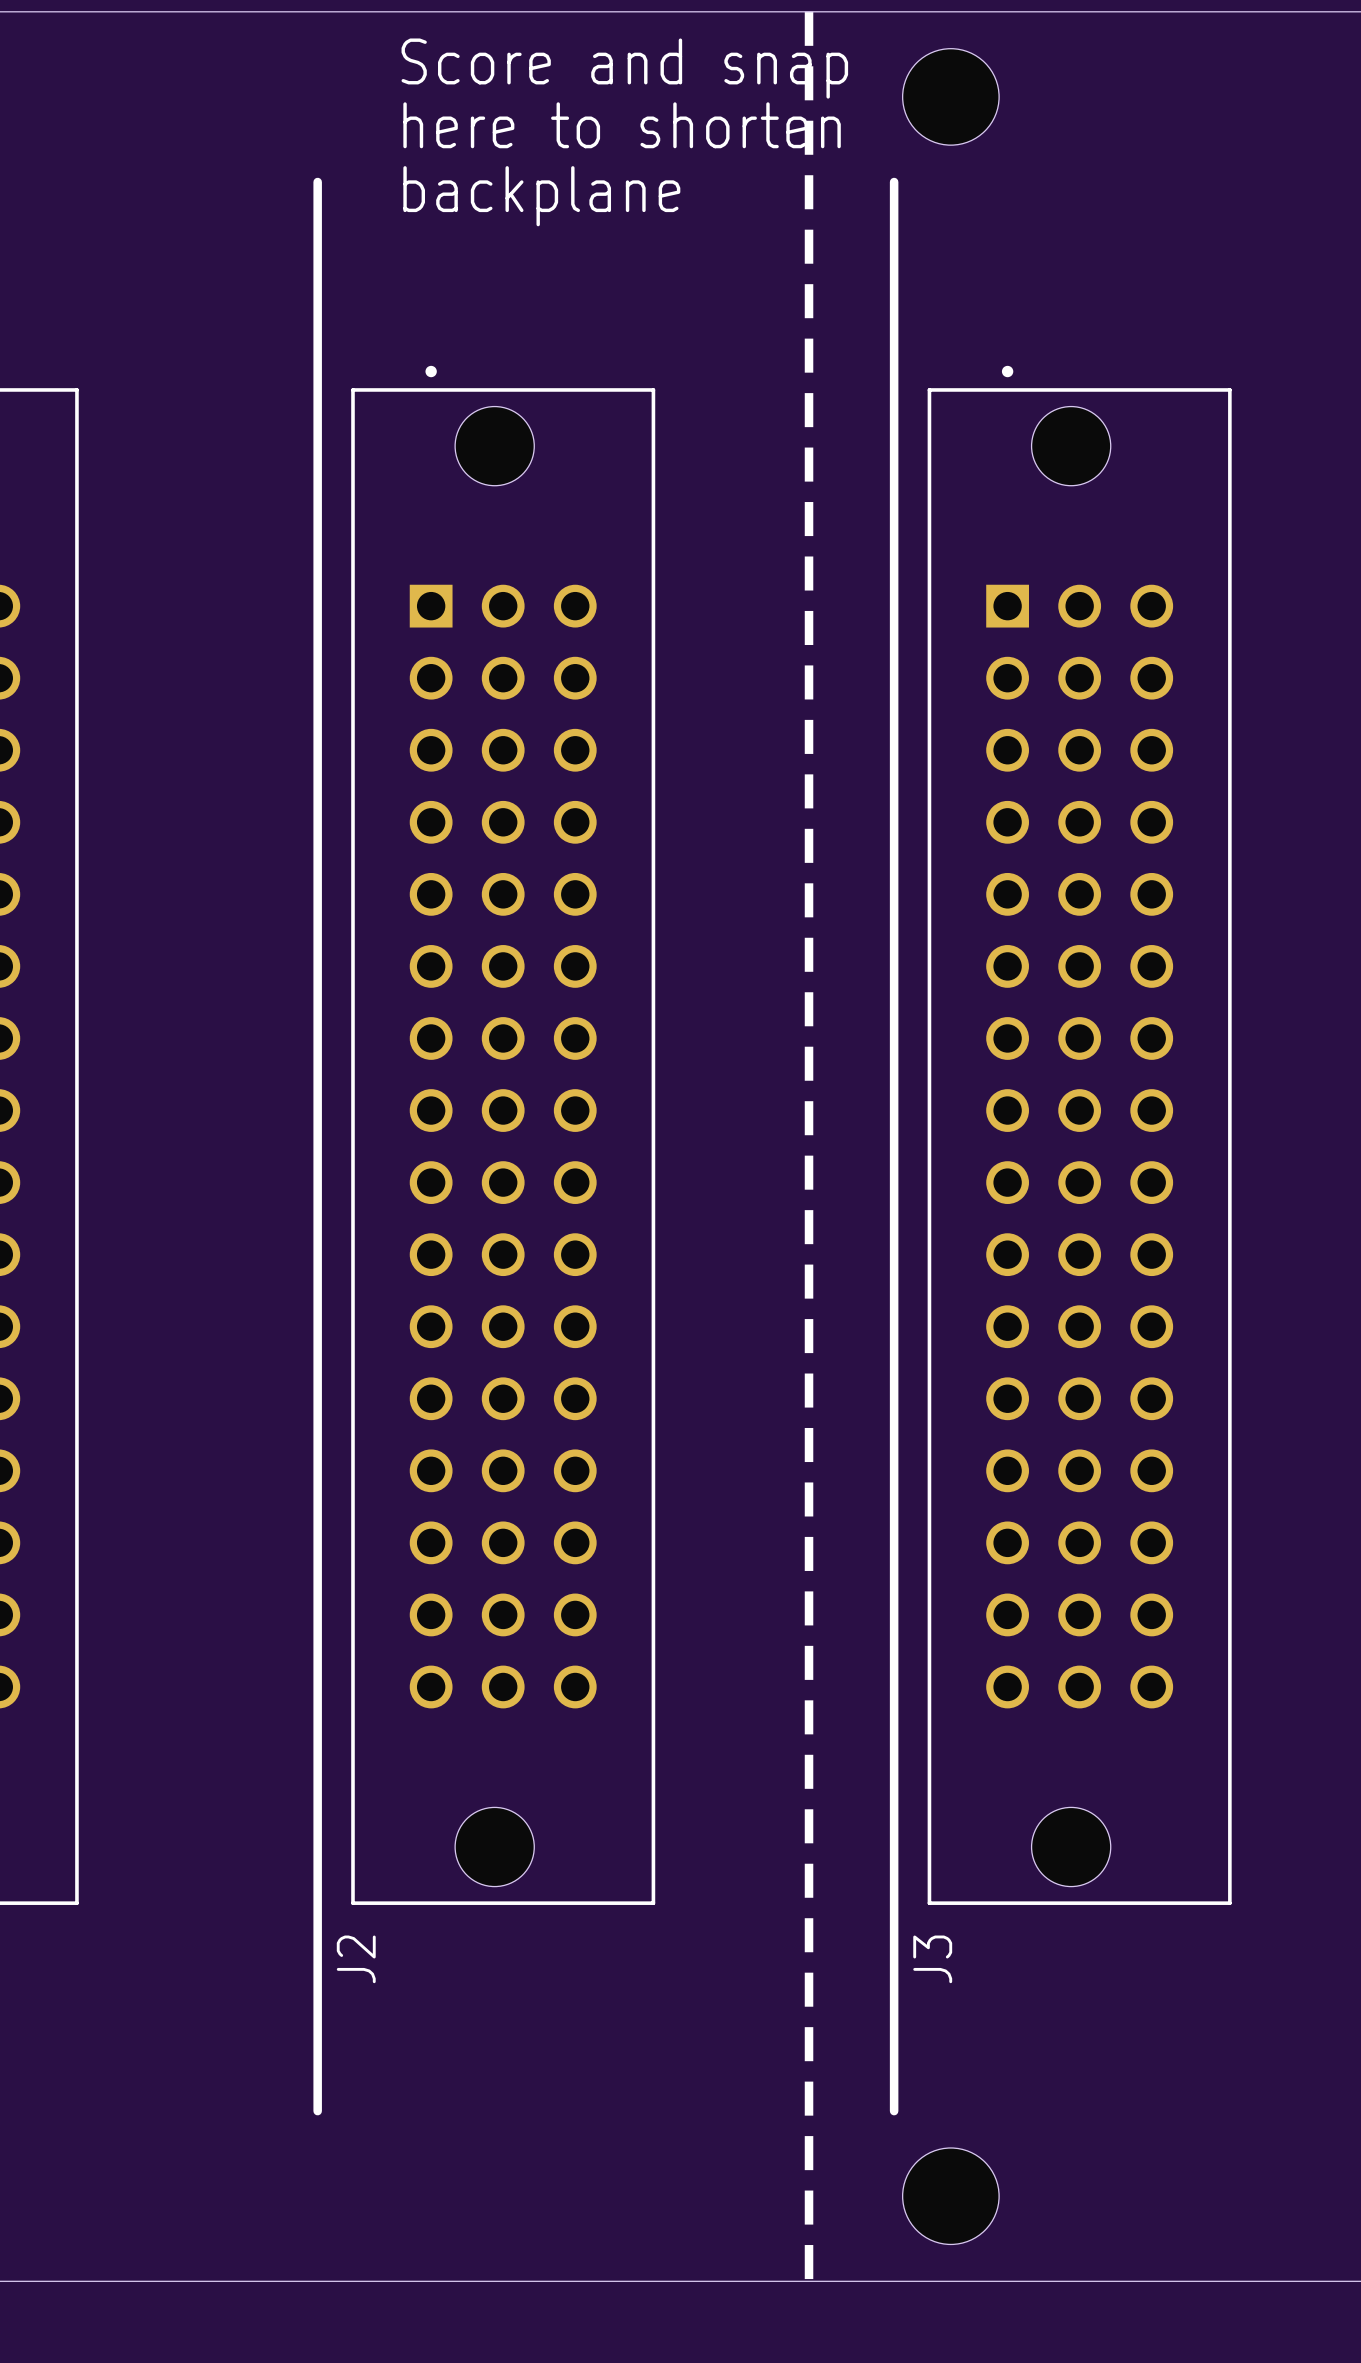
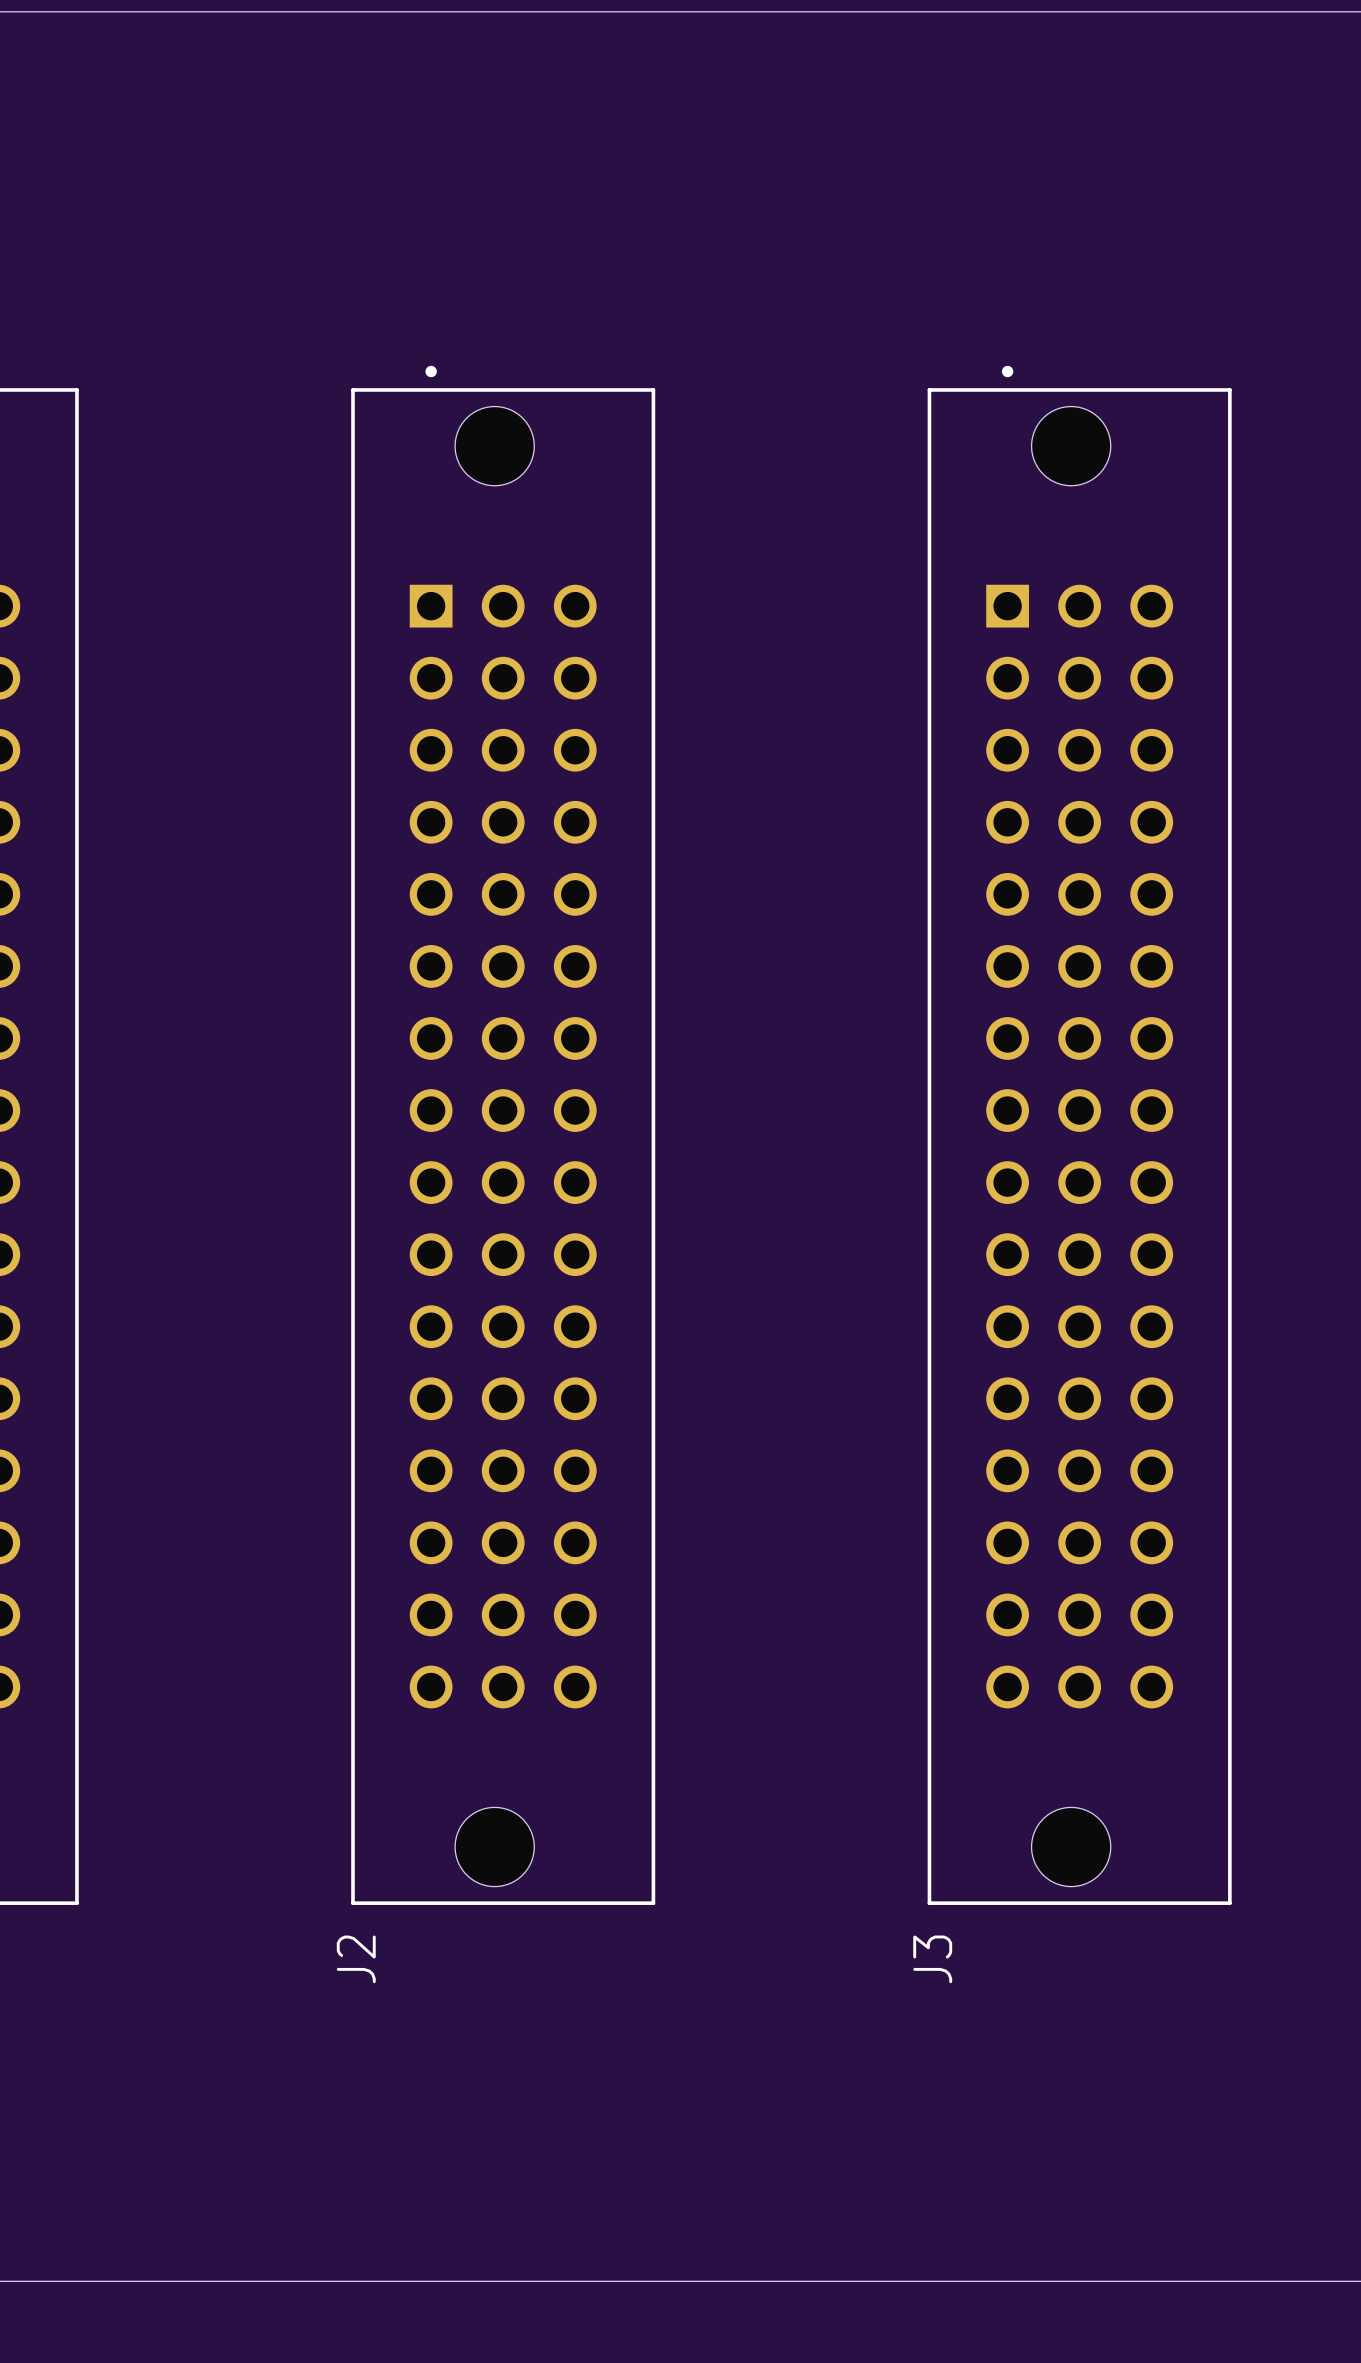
line: (809, 11) (809, 2281) -> none
text: Score and snap (624, 68) -> none
hole: (950, 96) -> none
text: here to shorten (622, 125) -> none
line: (317, 182) (317, 2111) -> none
line: (894, 182) (894, 2111) -> none
text: backplane (541, 196) -> none
hole: (950, 2196) -> none

